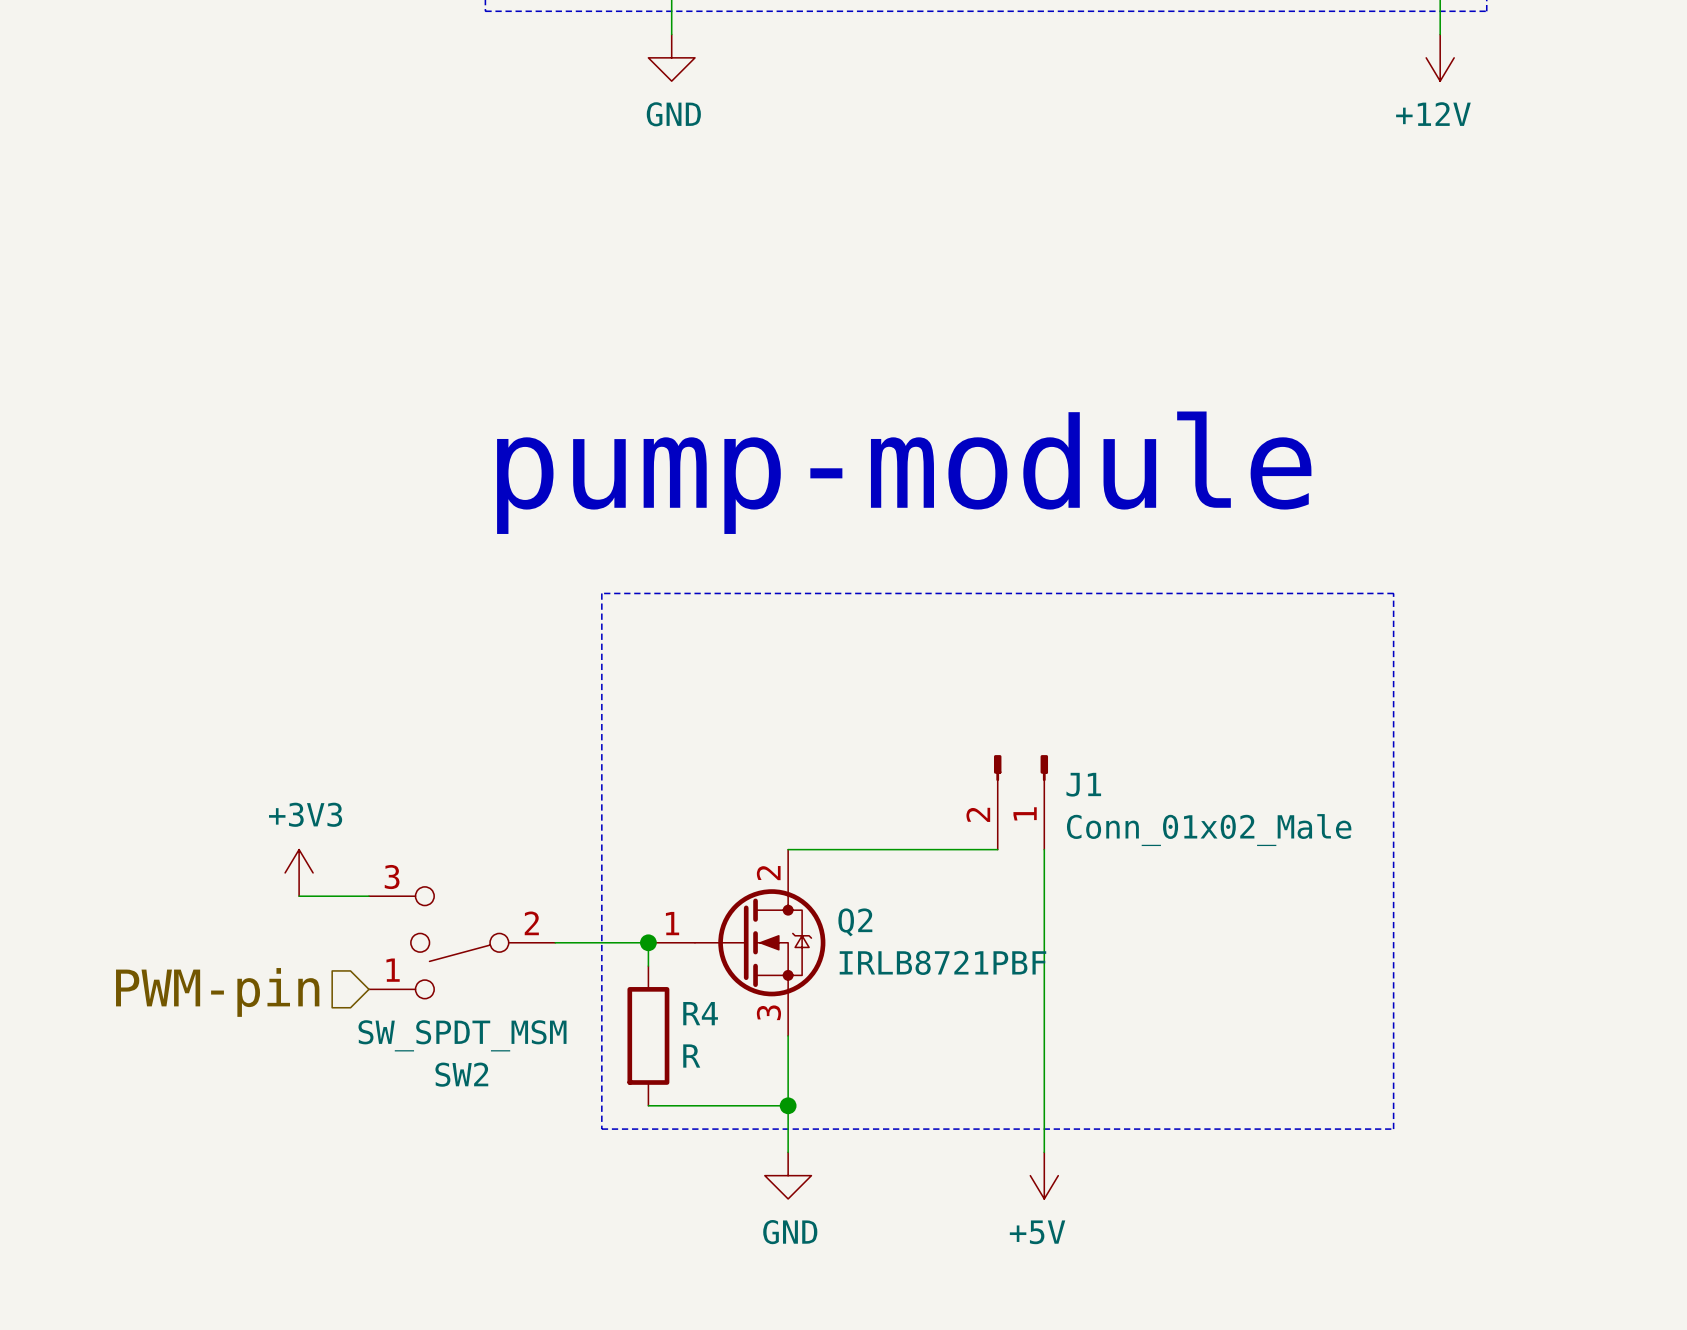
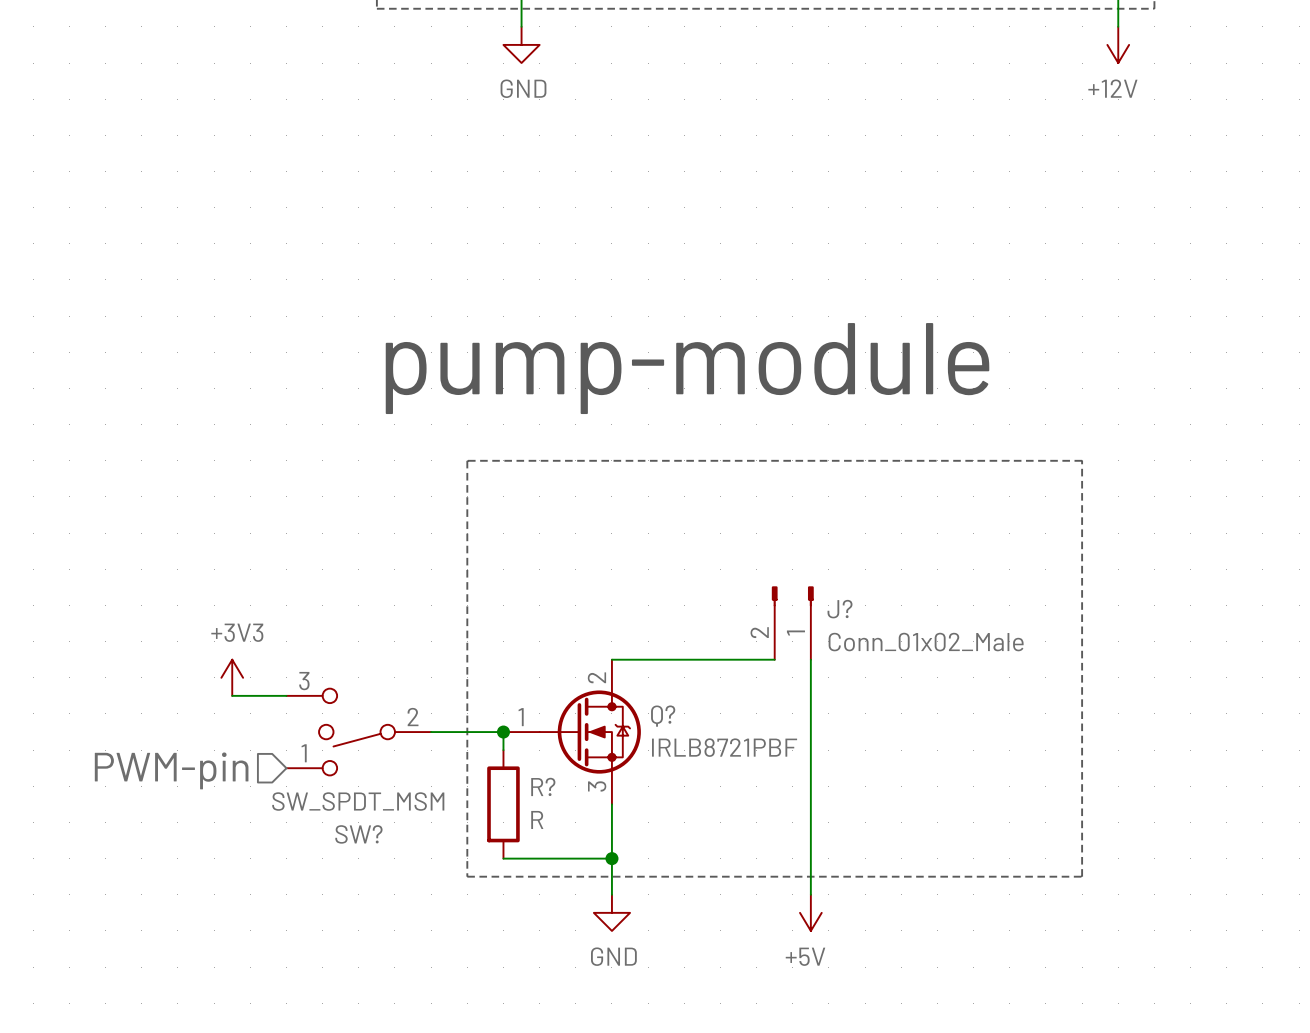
J1 name: J1 (1083, 784) -> J? (840, 609)
Q2 name: Q2 (855, 922) -> Q? (663, 716)
R4 name: R4 (700, 1013) -> R? (543, 786)
SW2 name: SW2 (461, 1074) -> SW? (358, 834)

